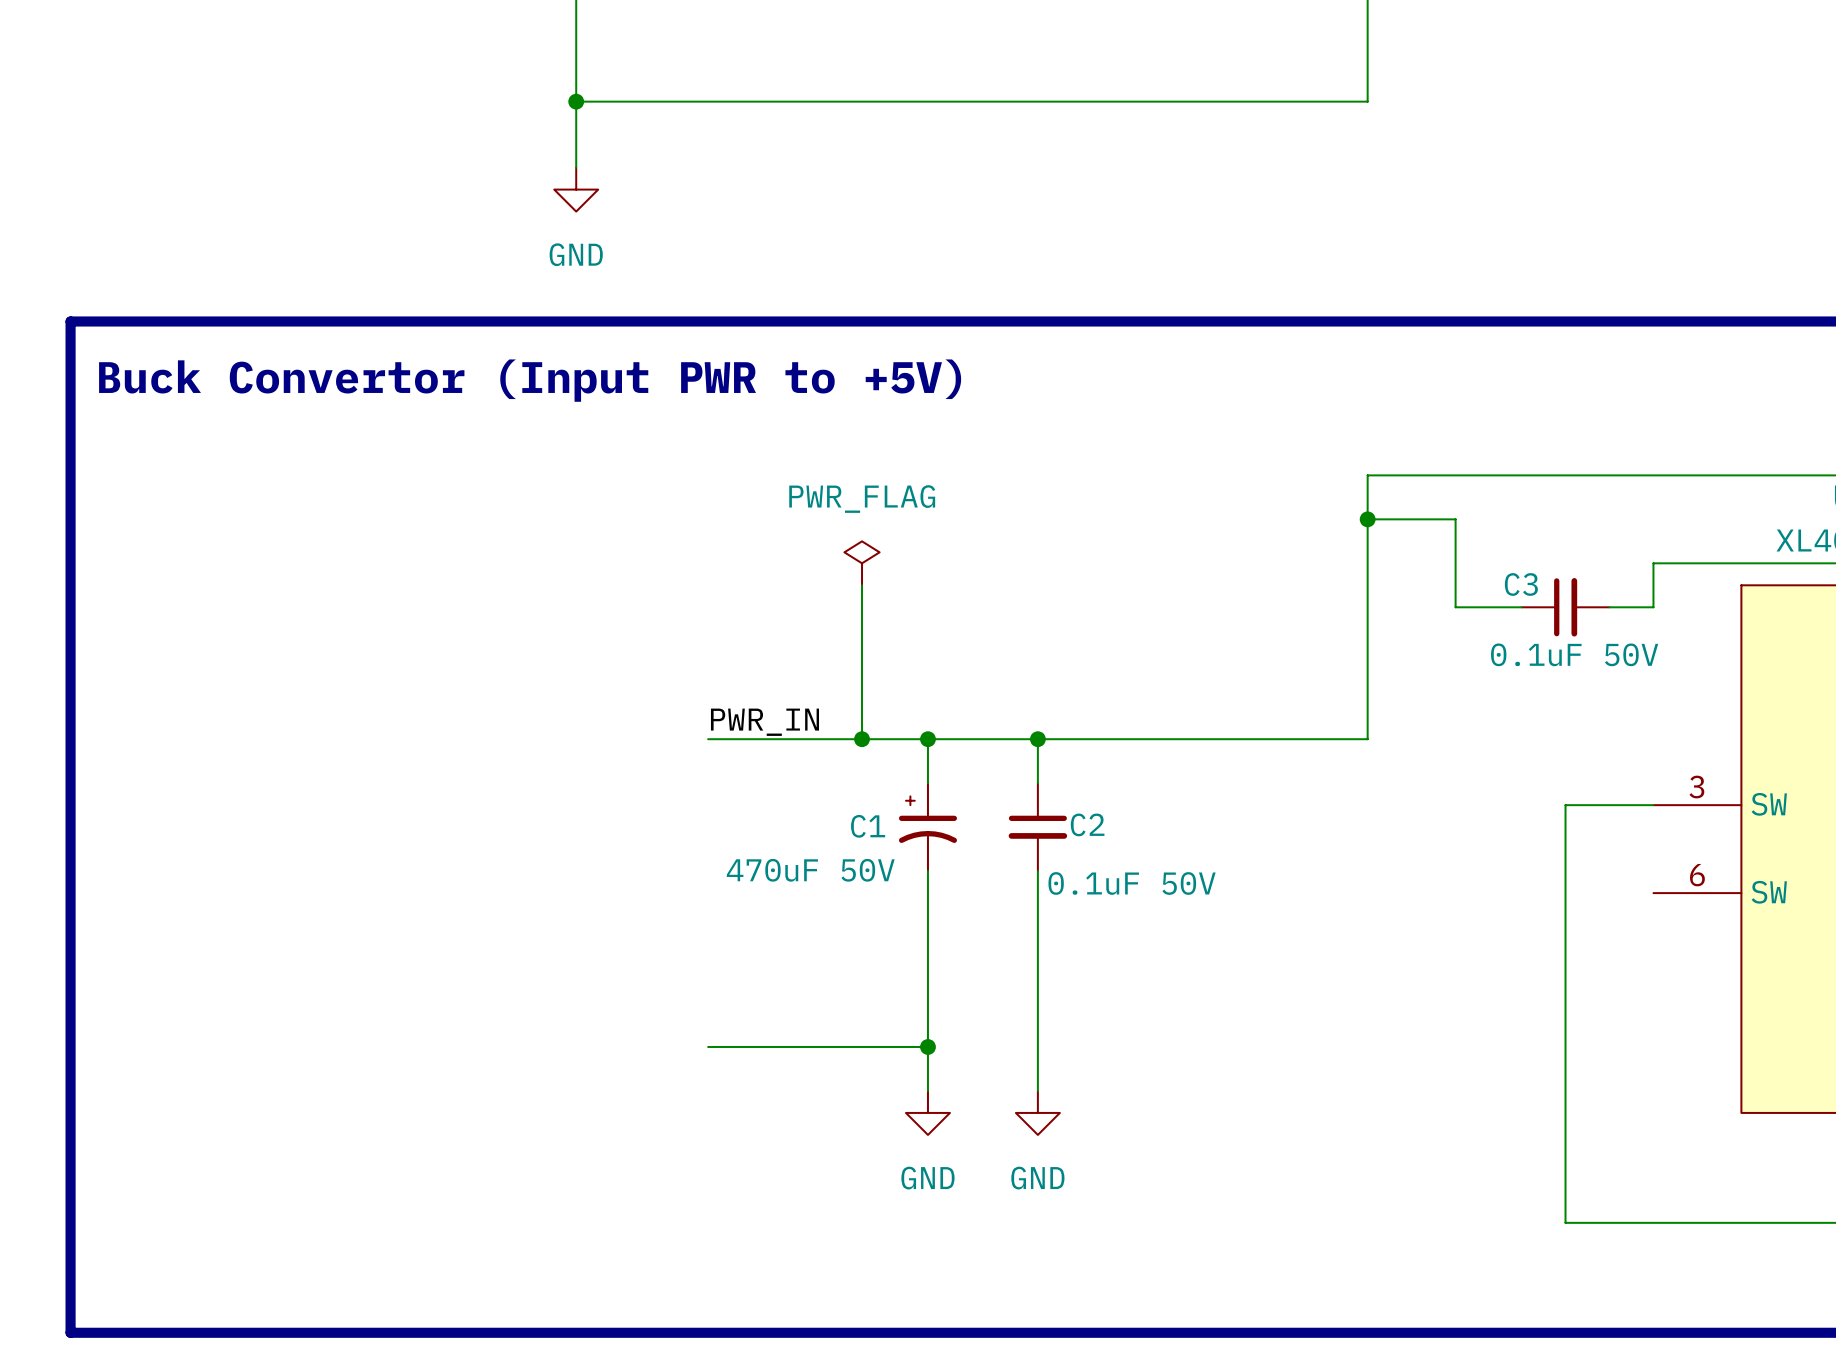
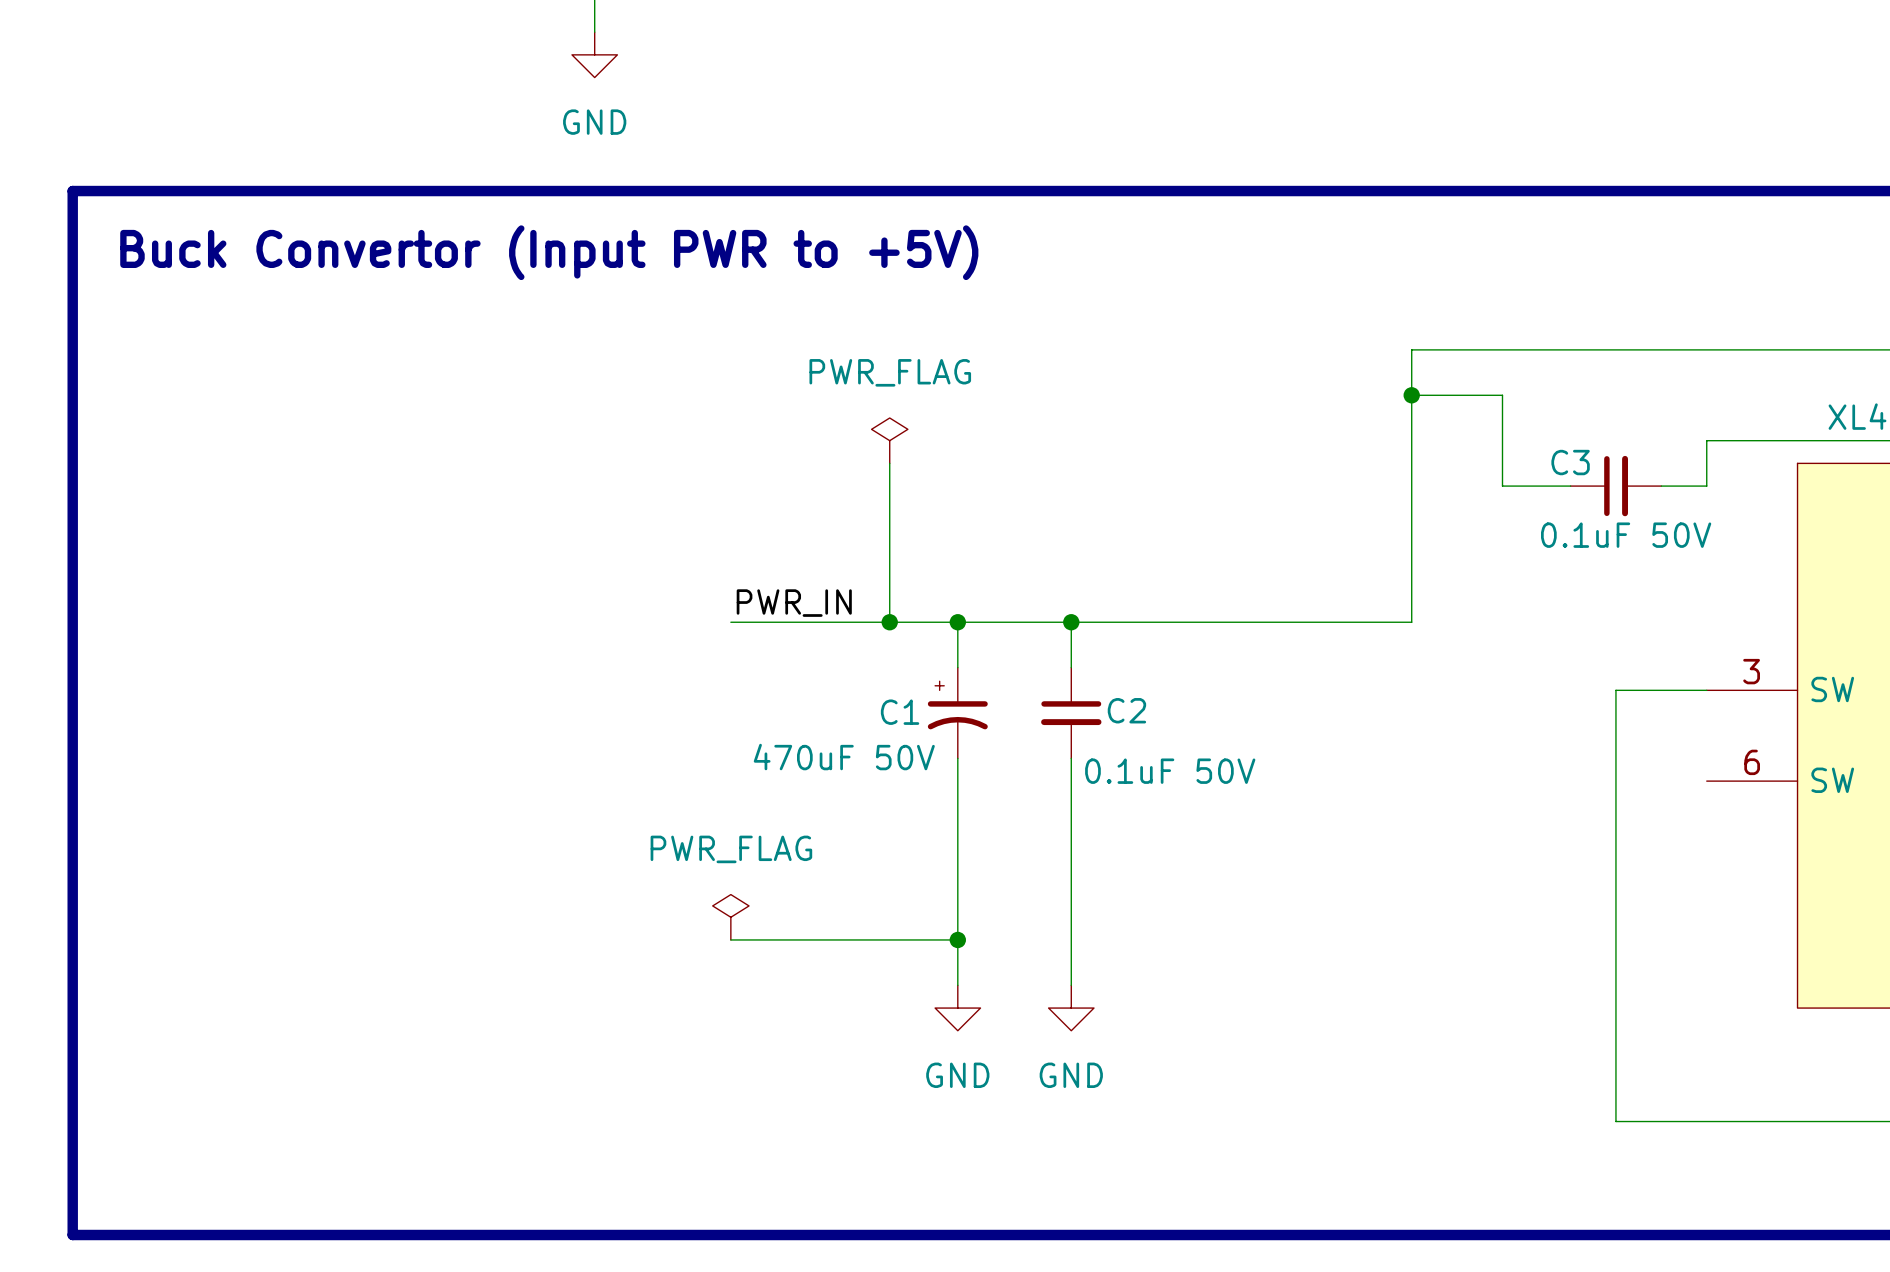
power symbol: none -> PWR_FLAG (730, 917)

